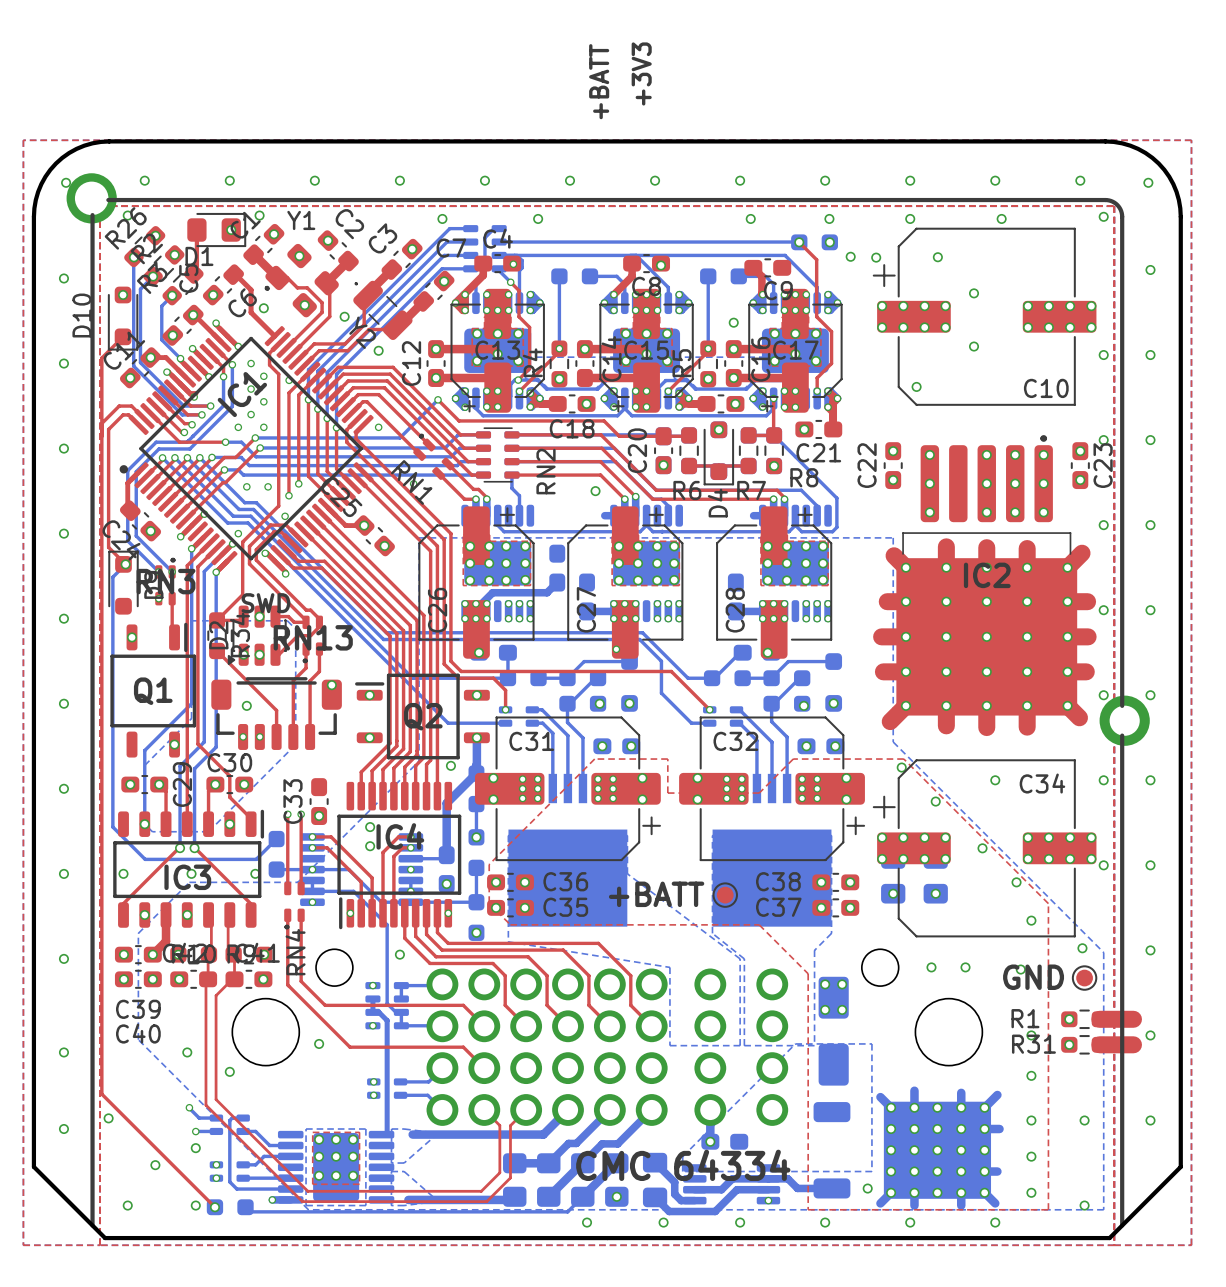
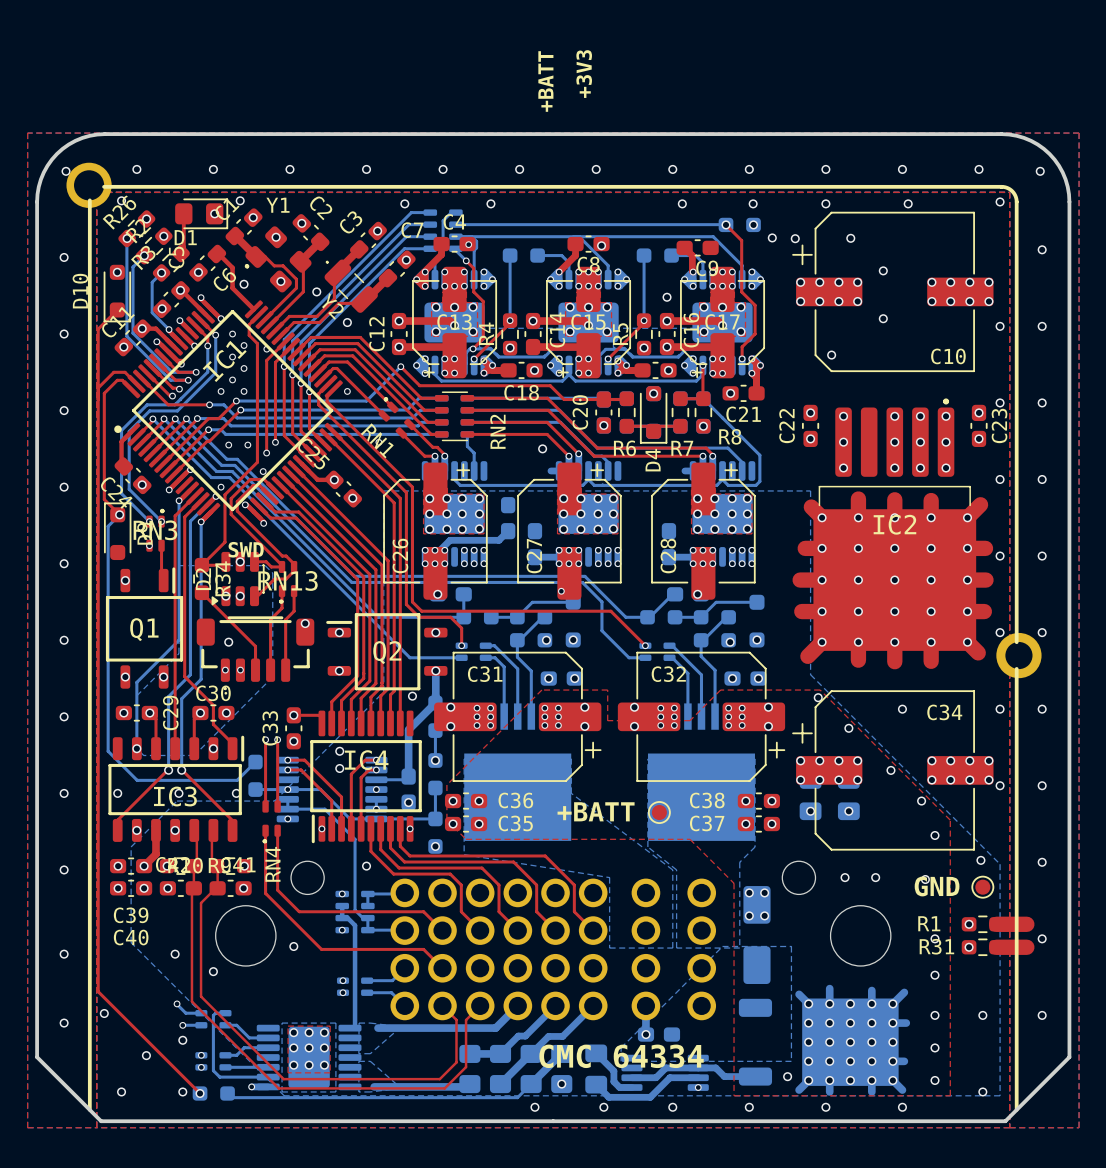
via: none -> (125, 677)
top track: none -> (293, 715) (319, 715) (321, 718) (321, 723)
via: none -> (293, 715)

